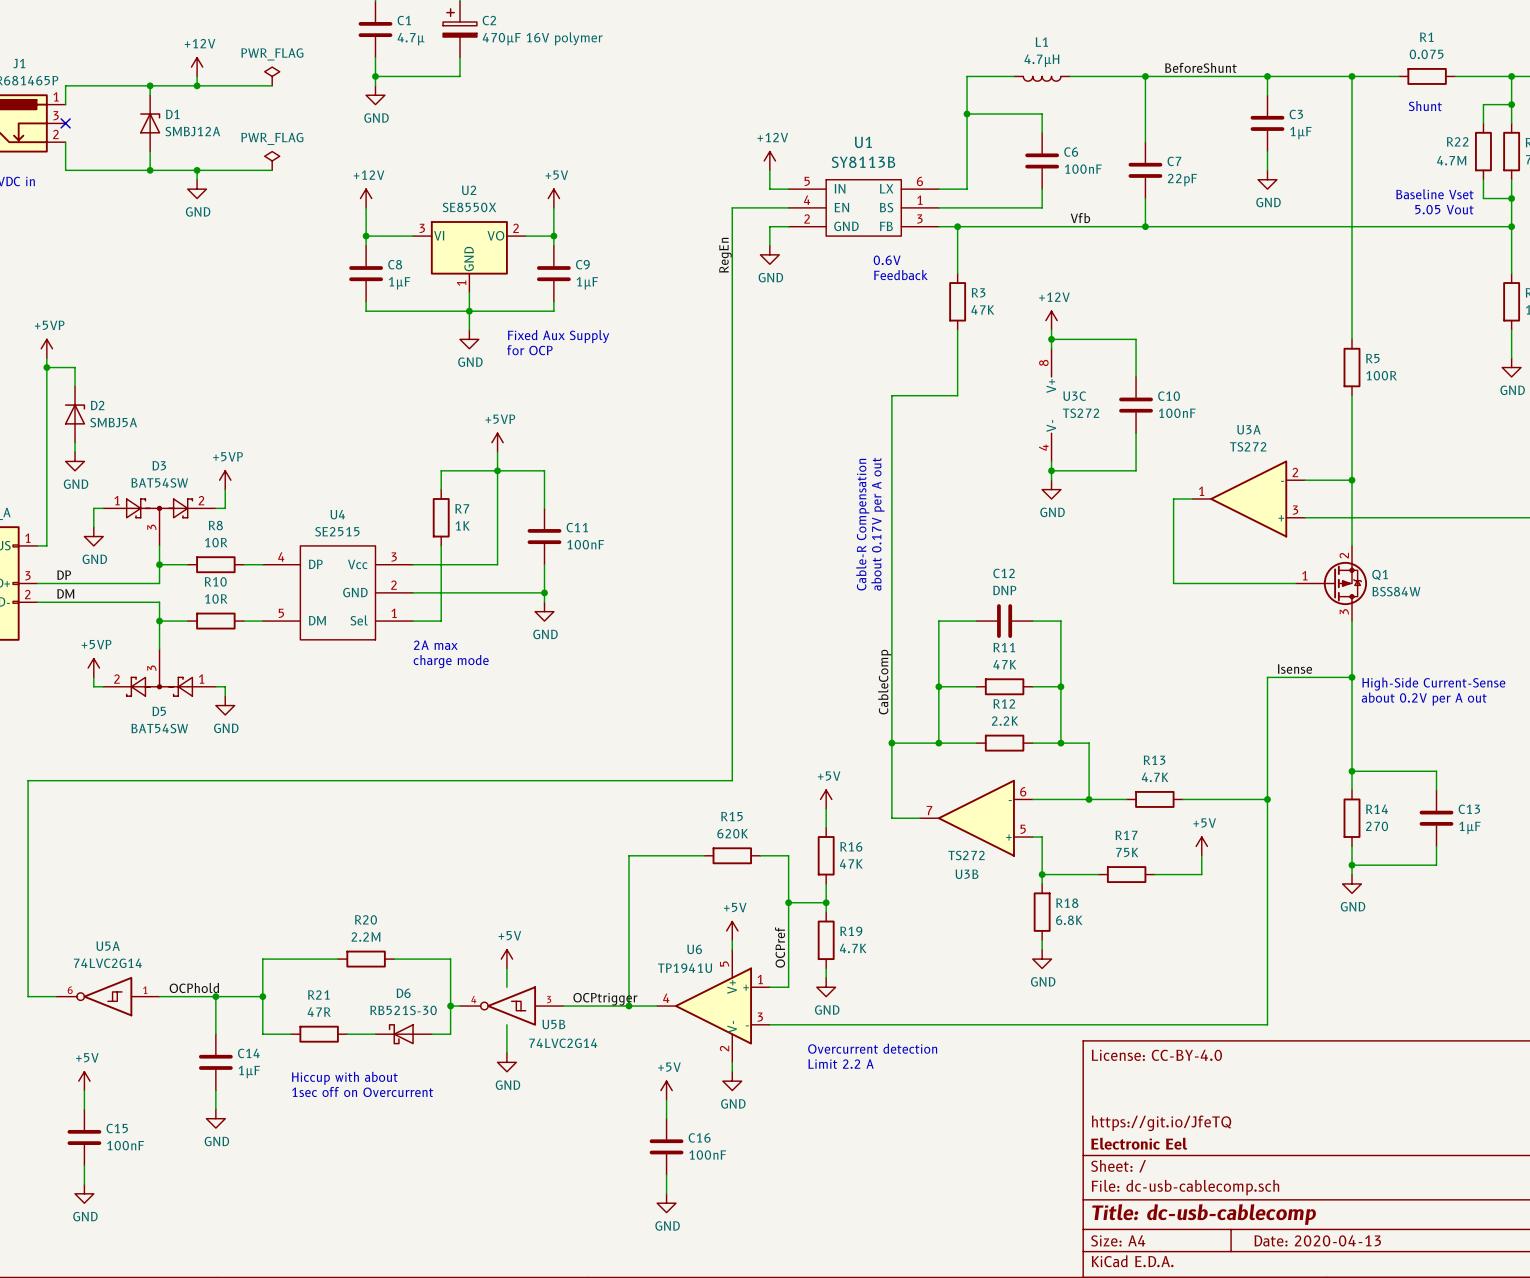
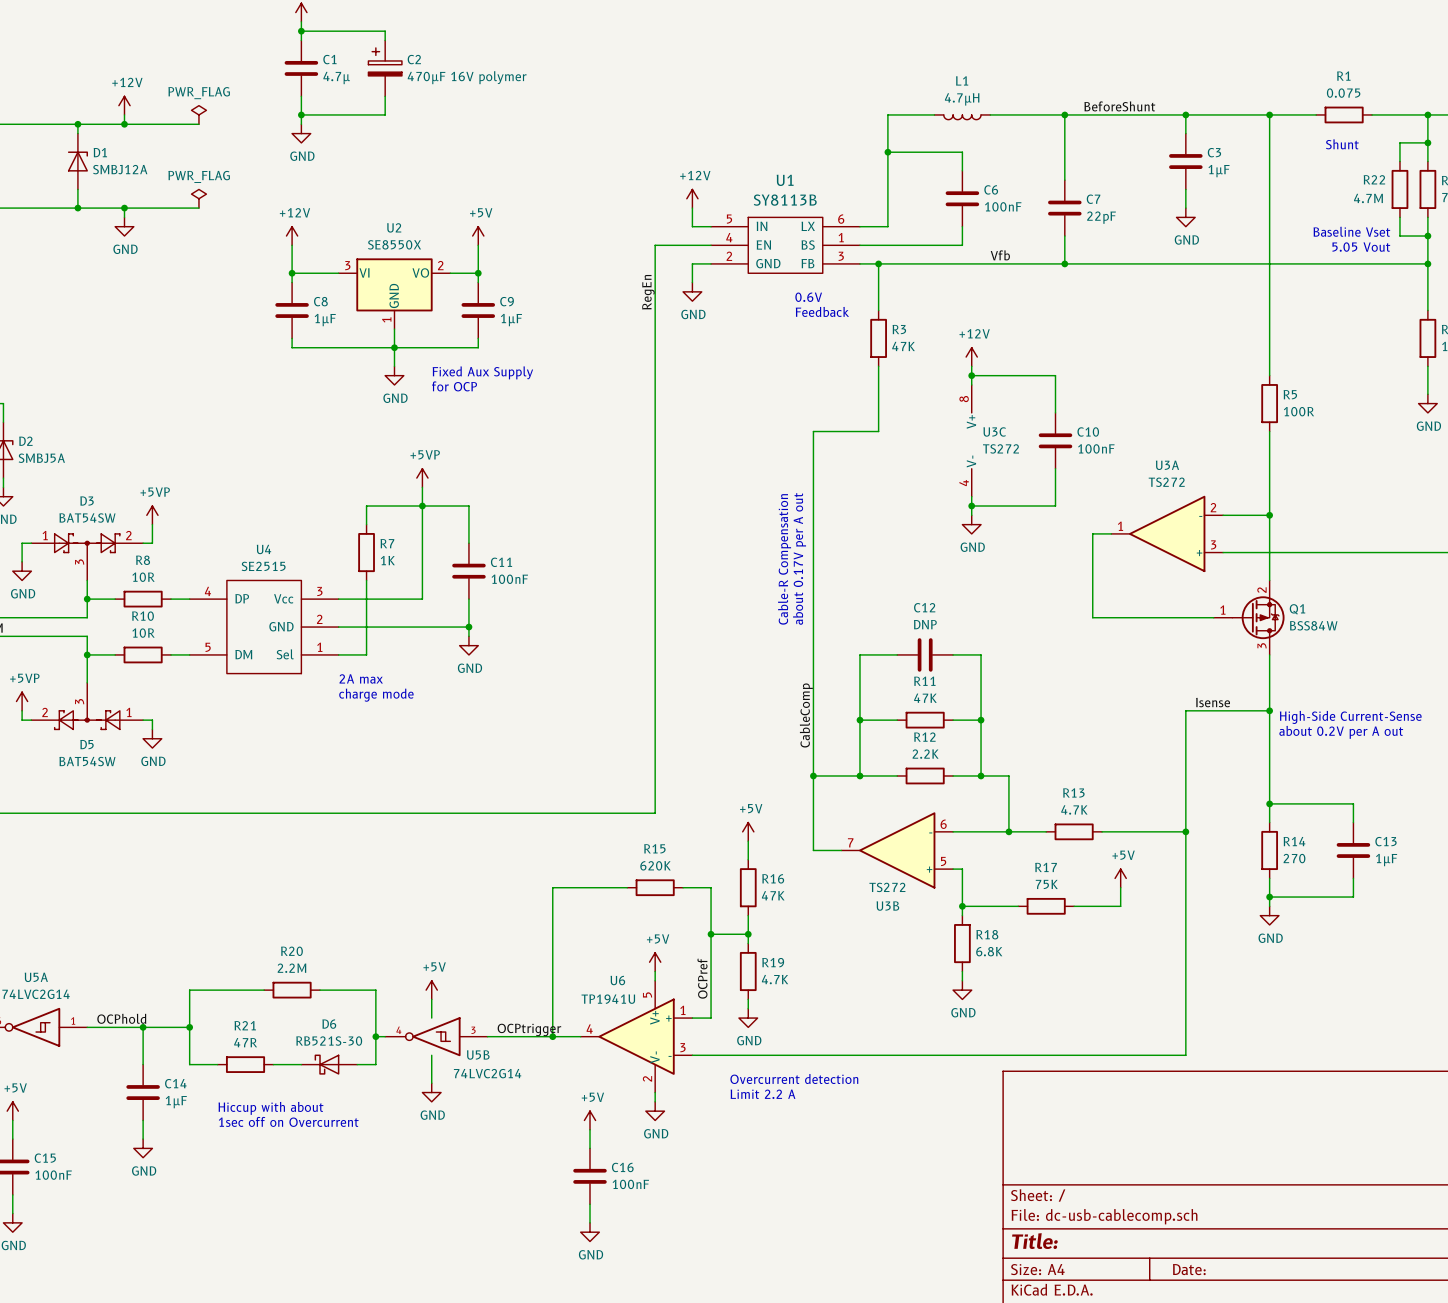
title block: License: CC-BY-4.0 (1156, 1055) -> none
title block: https://git.io/JfeTQ (1161, 1123) -> none
title block: Electronic Eel (1139, 1143) -> none
title block: Title: dc-usb-cablecomp (1204, 1214) -> Title: (1034, 1241)
title block: Date: 2020-04-13 (1317, 1240) -> Date: (1189, 1269)

